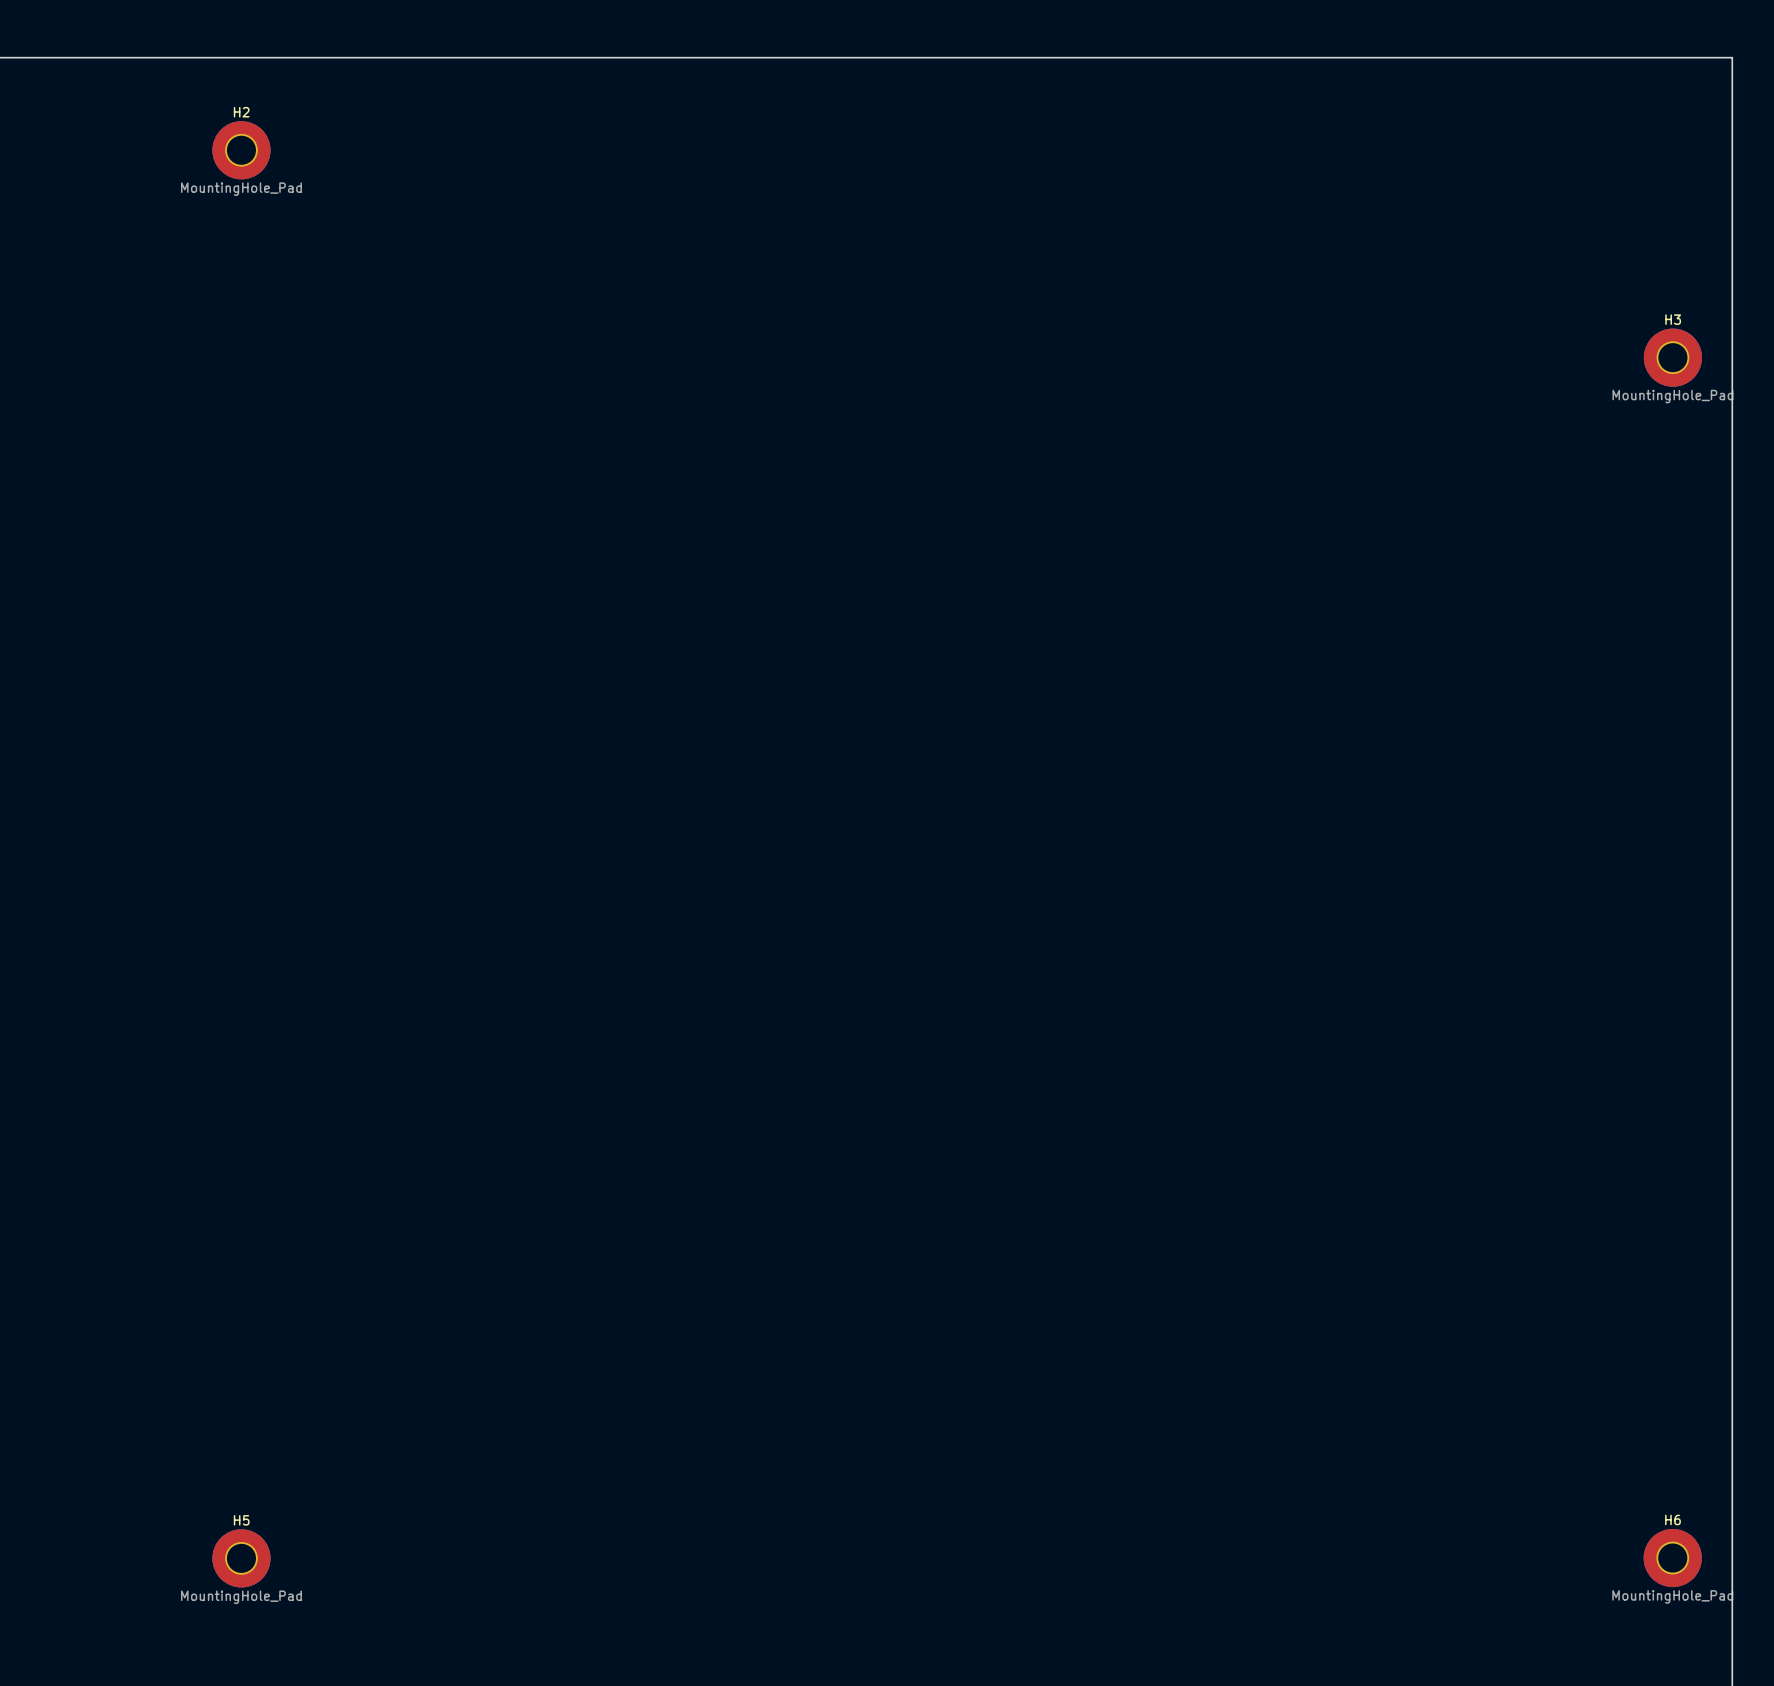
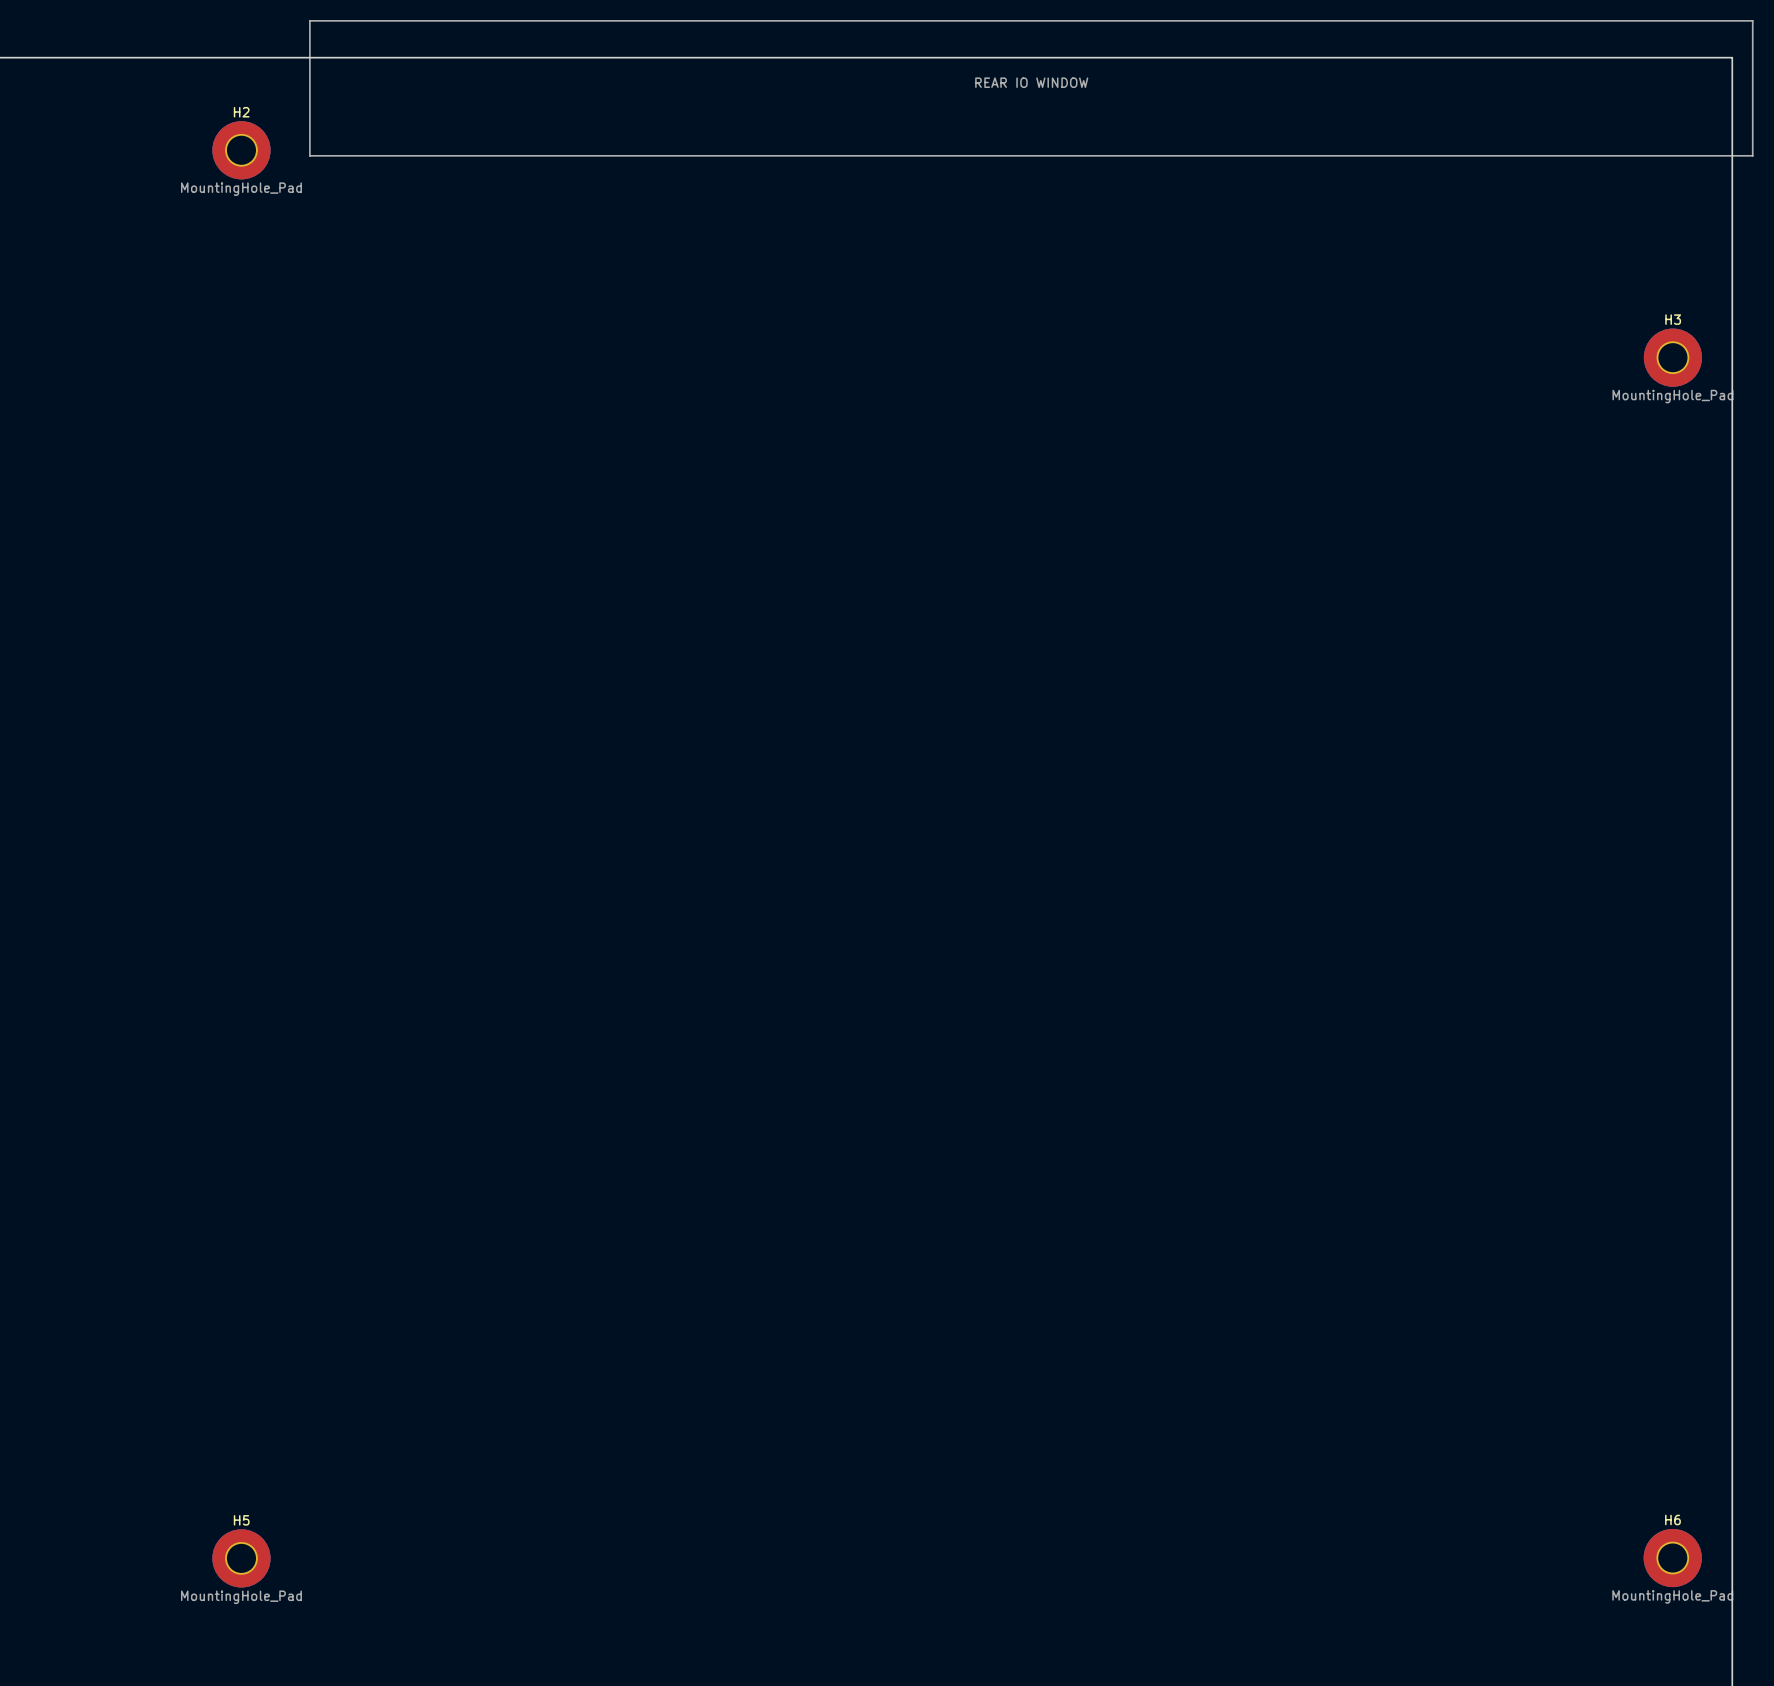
line: none -> (309, 20) (1752, 20) (1752, 155) (309, 155) (309, 20)
text: none -> REAR IO WINDOW (1031, 82)

